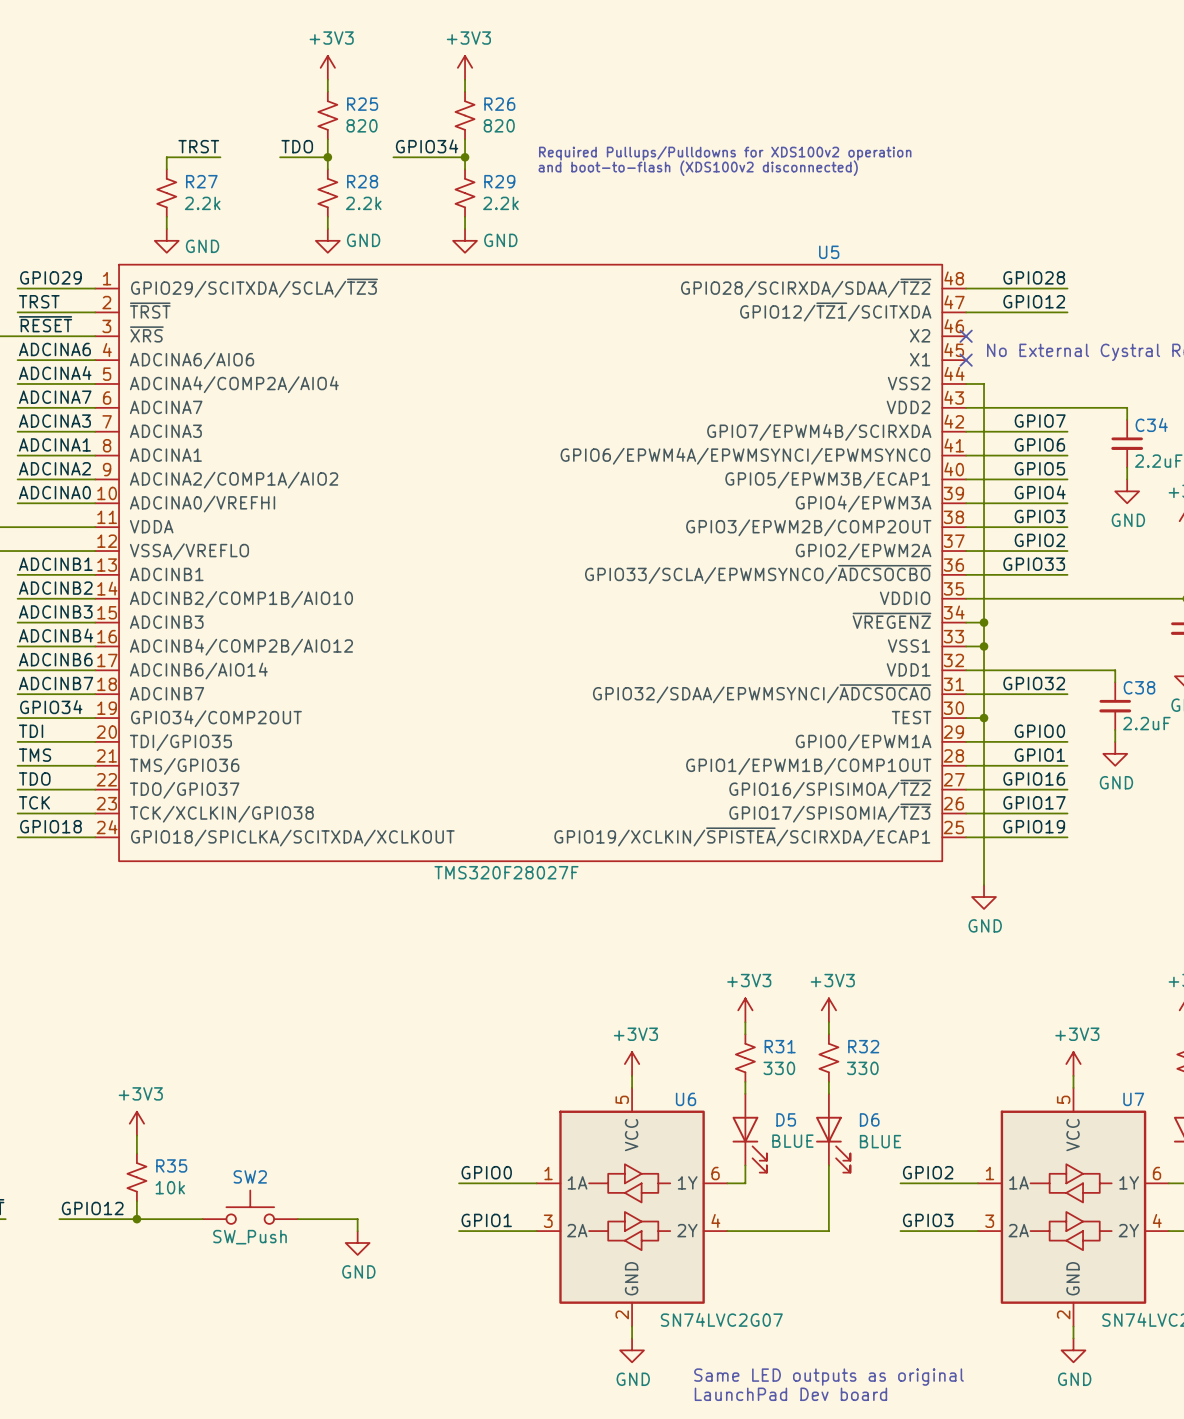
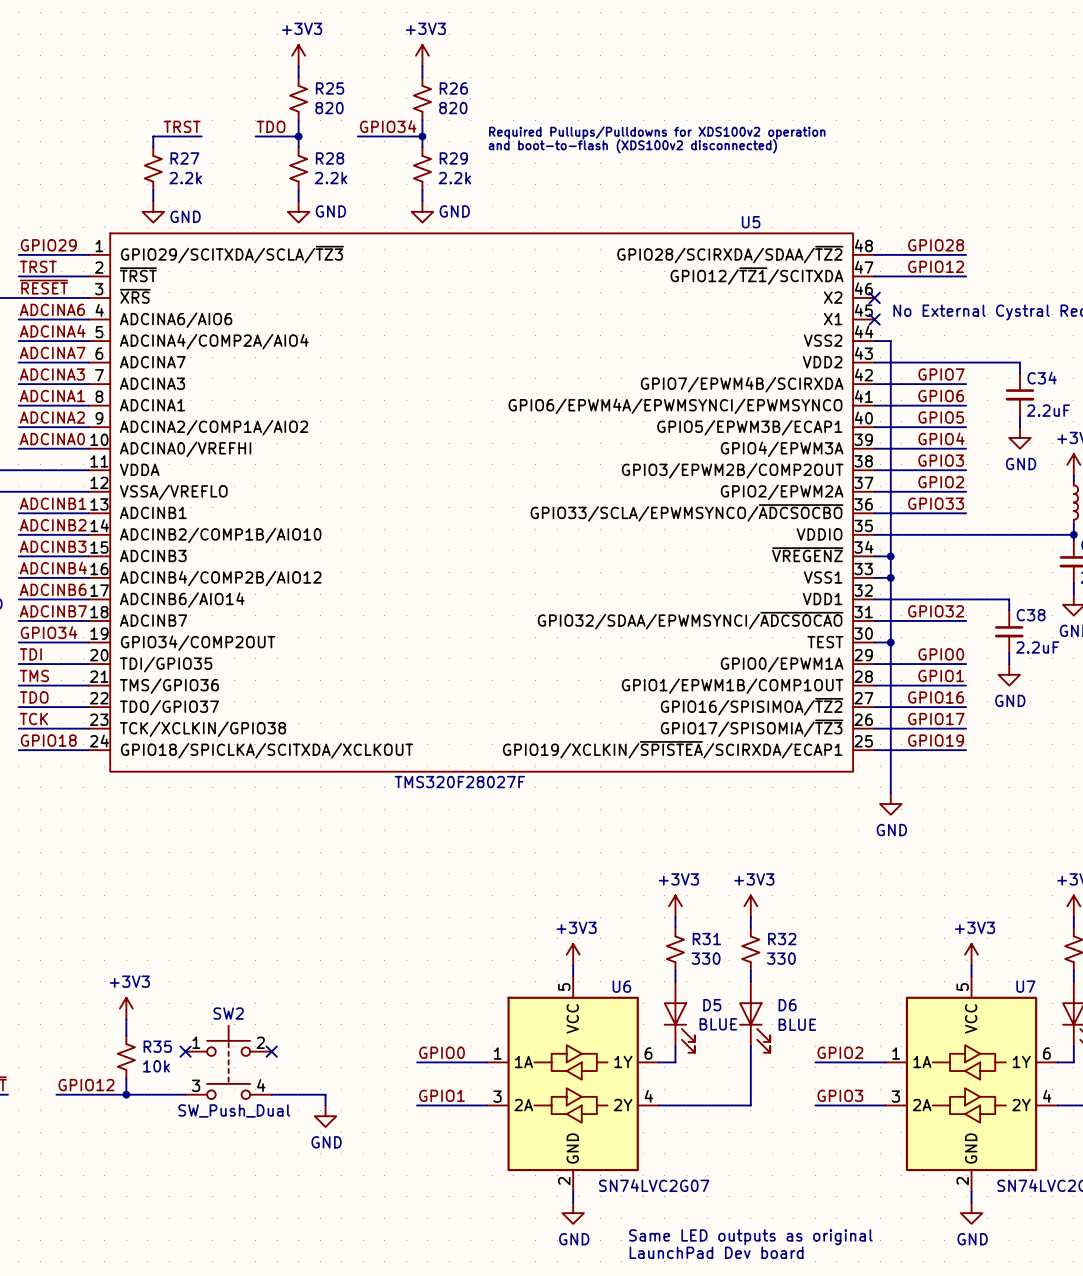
no-connect mark: none -> (185, 1051)
no-connect mark: none -> (271, 1051)
SW2 name position: SW2 (250, 1176) -> SW2 (228, 1013)
SW2 symbol: [202, 1190, 298, 1224] -> [185, 1025, 272, 1100]
SW2 value: SW_Push (249, 1237) -> SW_Push_Dual (234, 1110)

